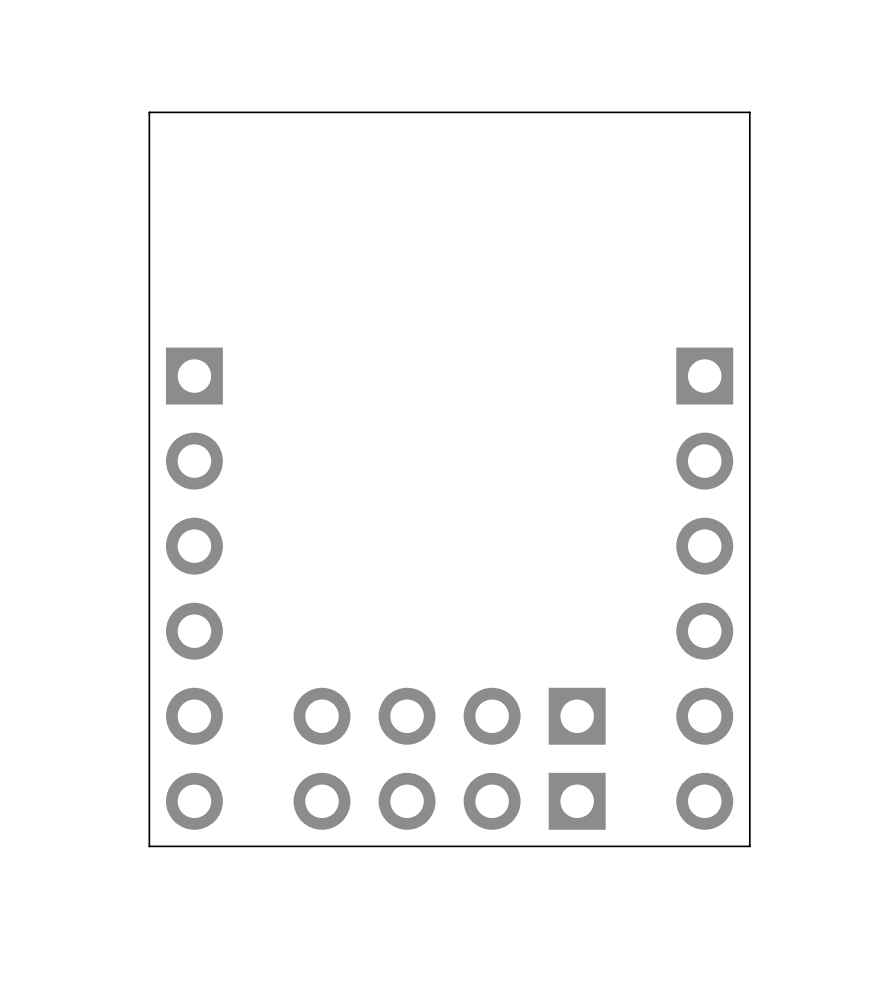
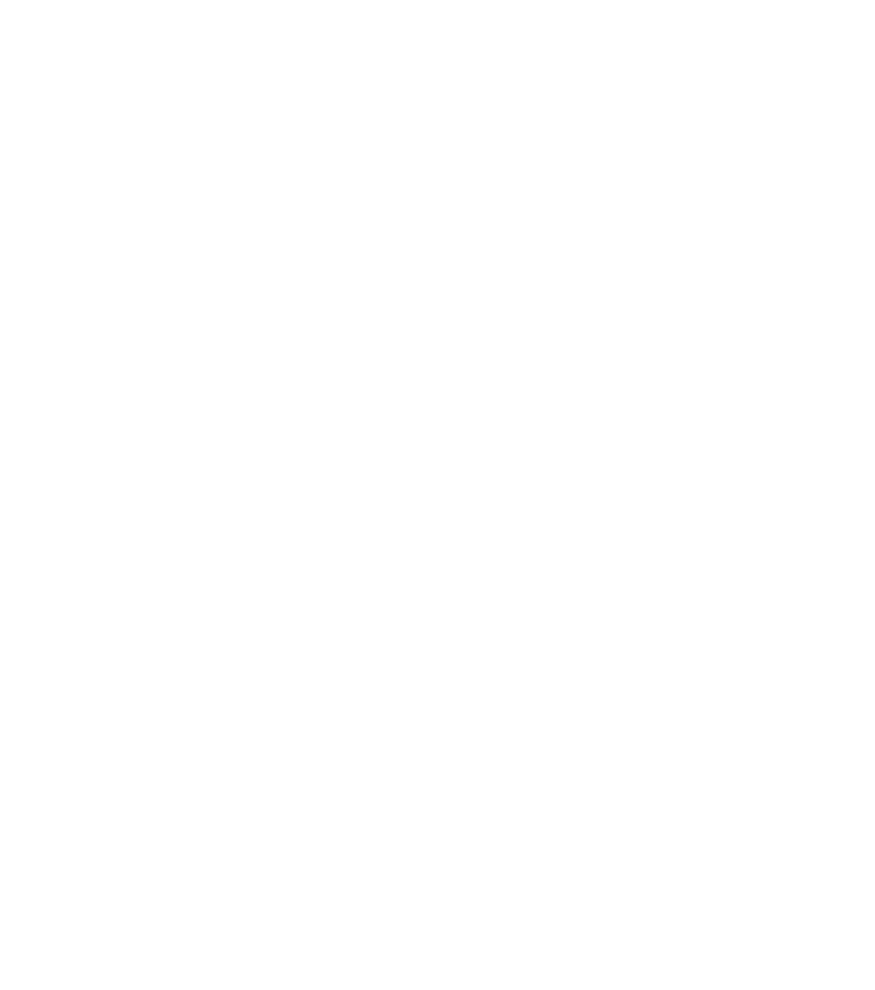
board edge: (749, 112) (149, 112) (149, 846) (749, 846) (749, 112) -> none
part: (194, 588) -> none
part: (704, 588) -> none
part: (449, 716) -> none
part: (449, 801) -> none

